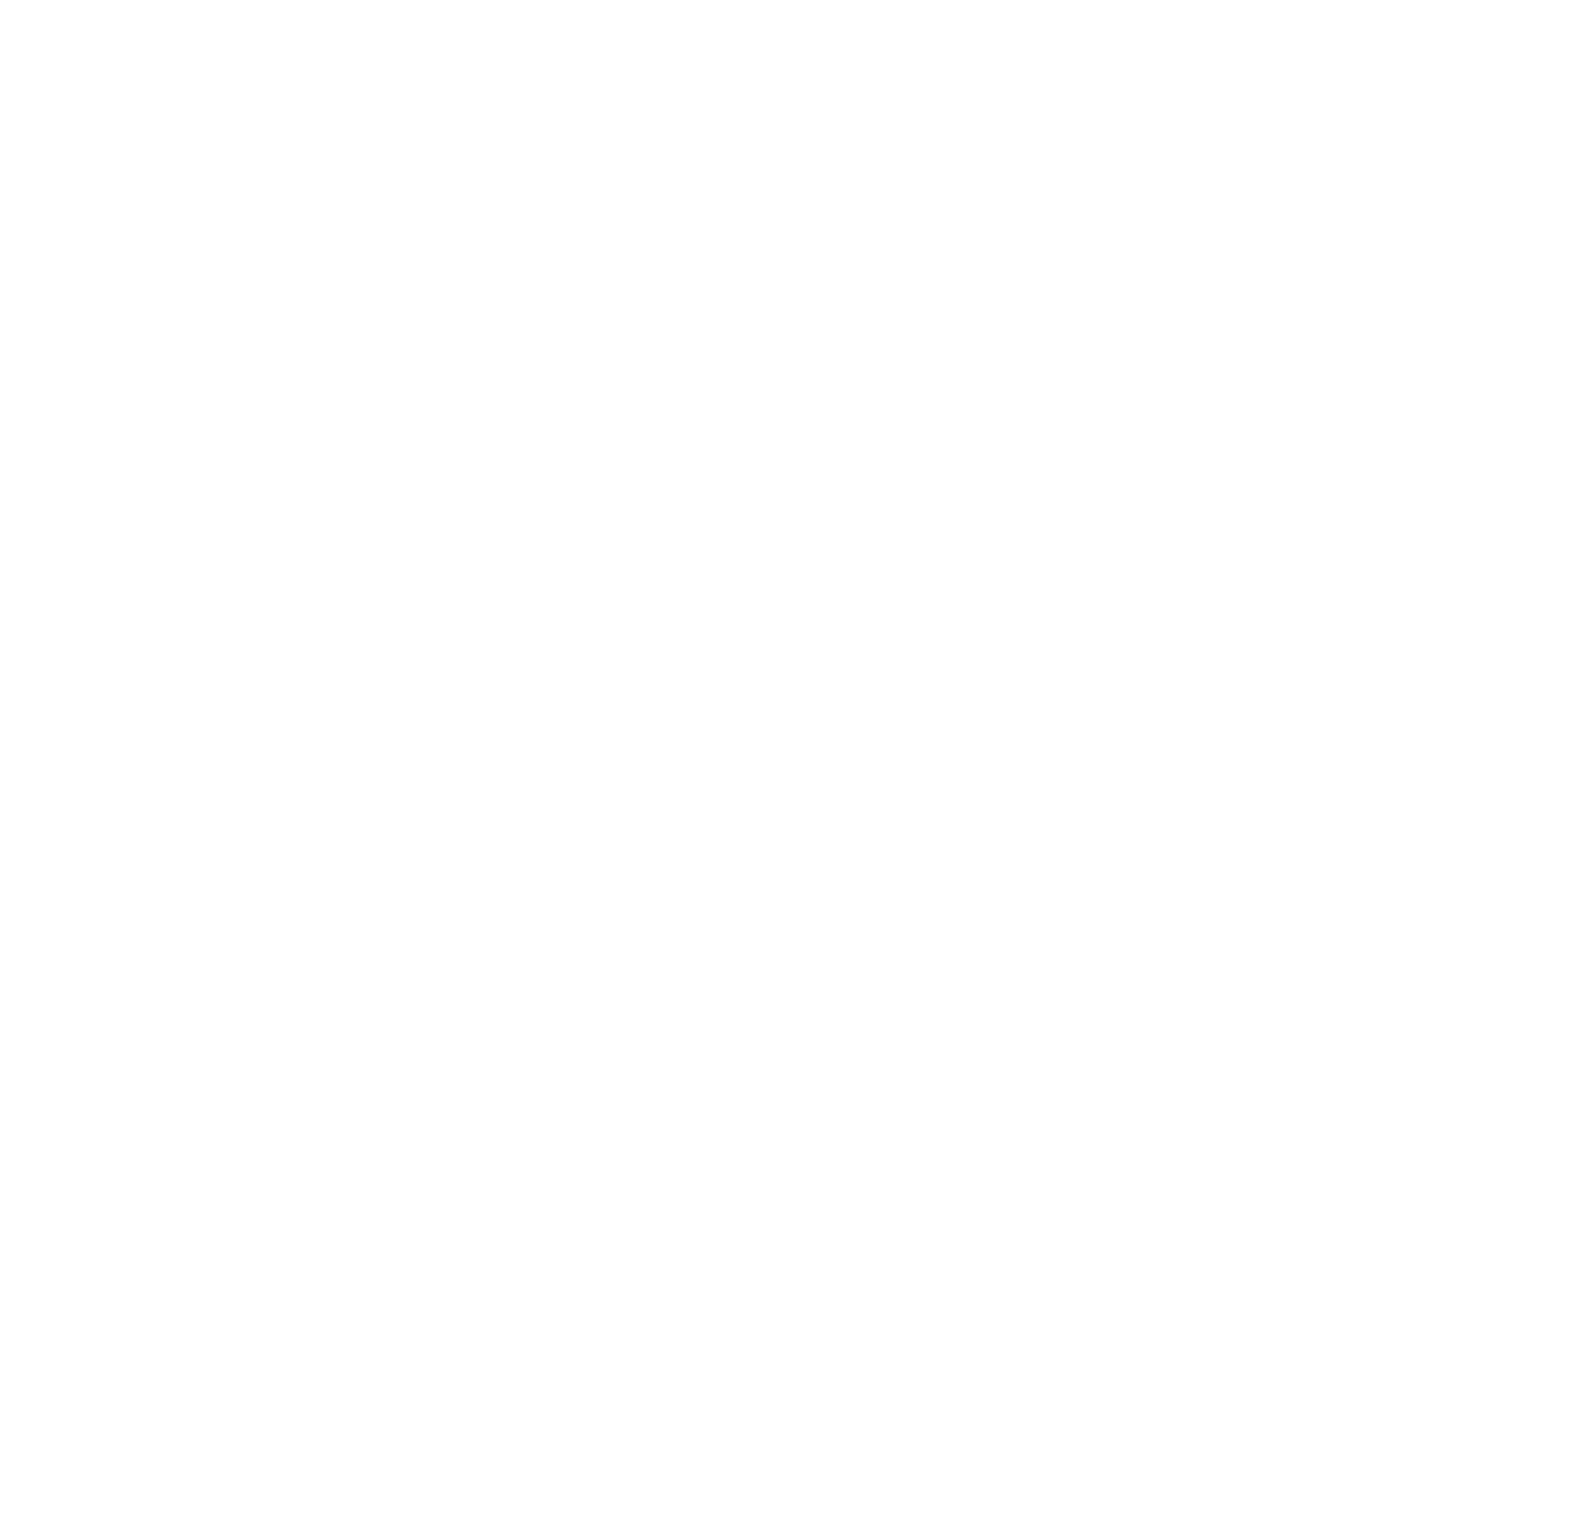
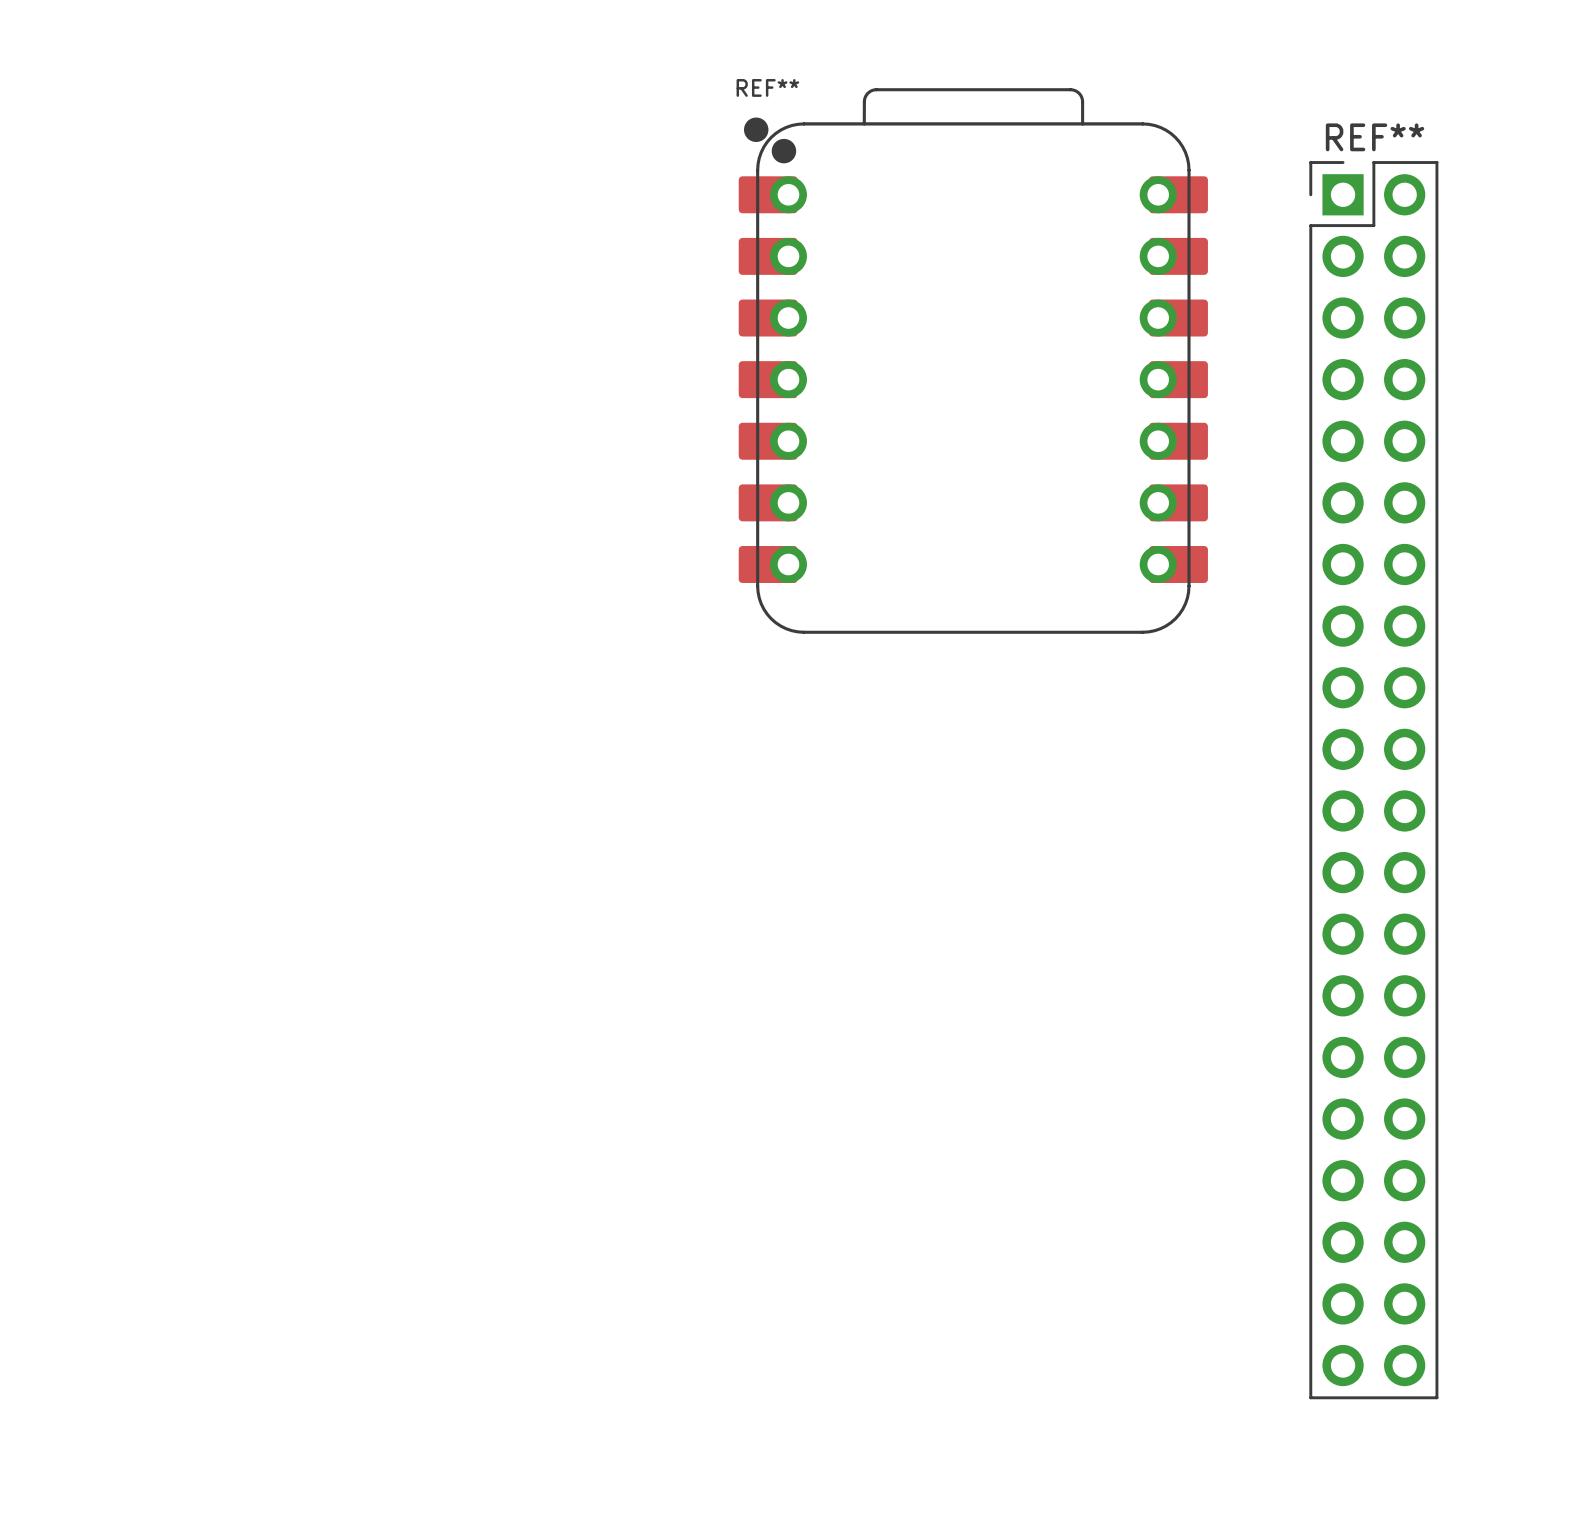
REF**: none -> (973, 360)
REF**: none -> (1373, 780)

